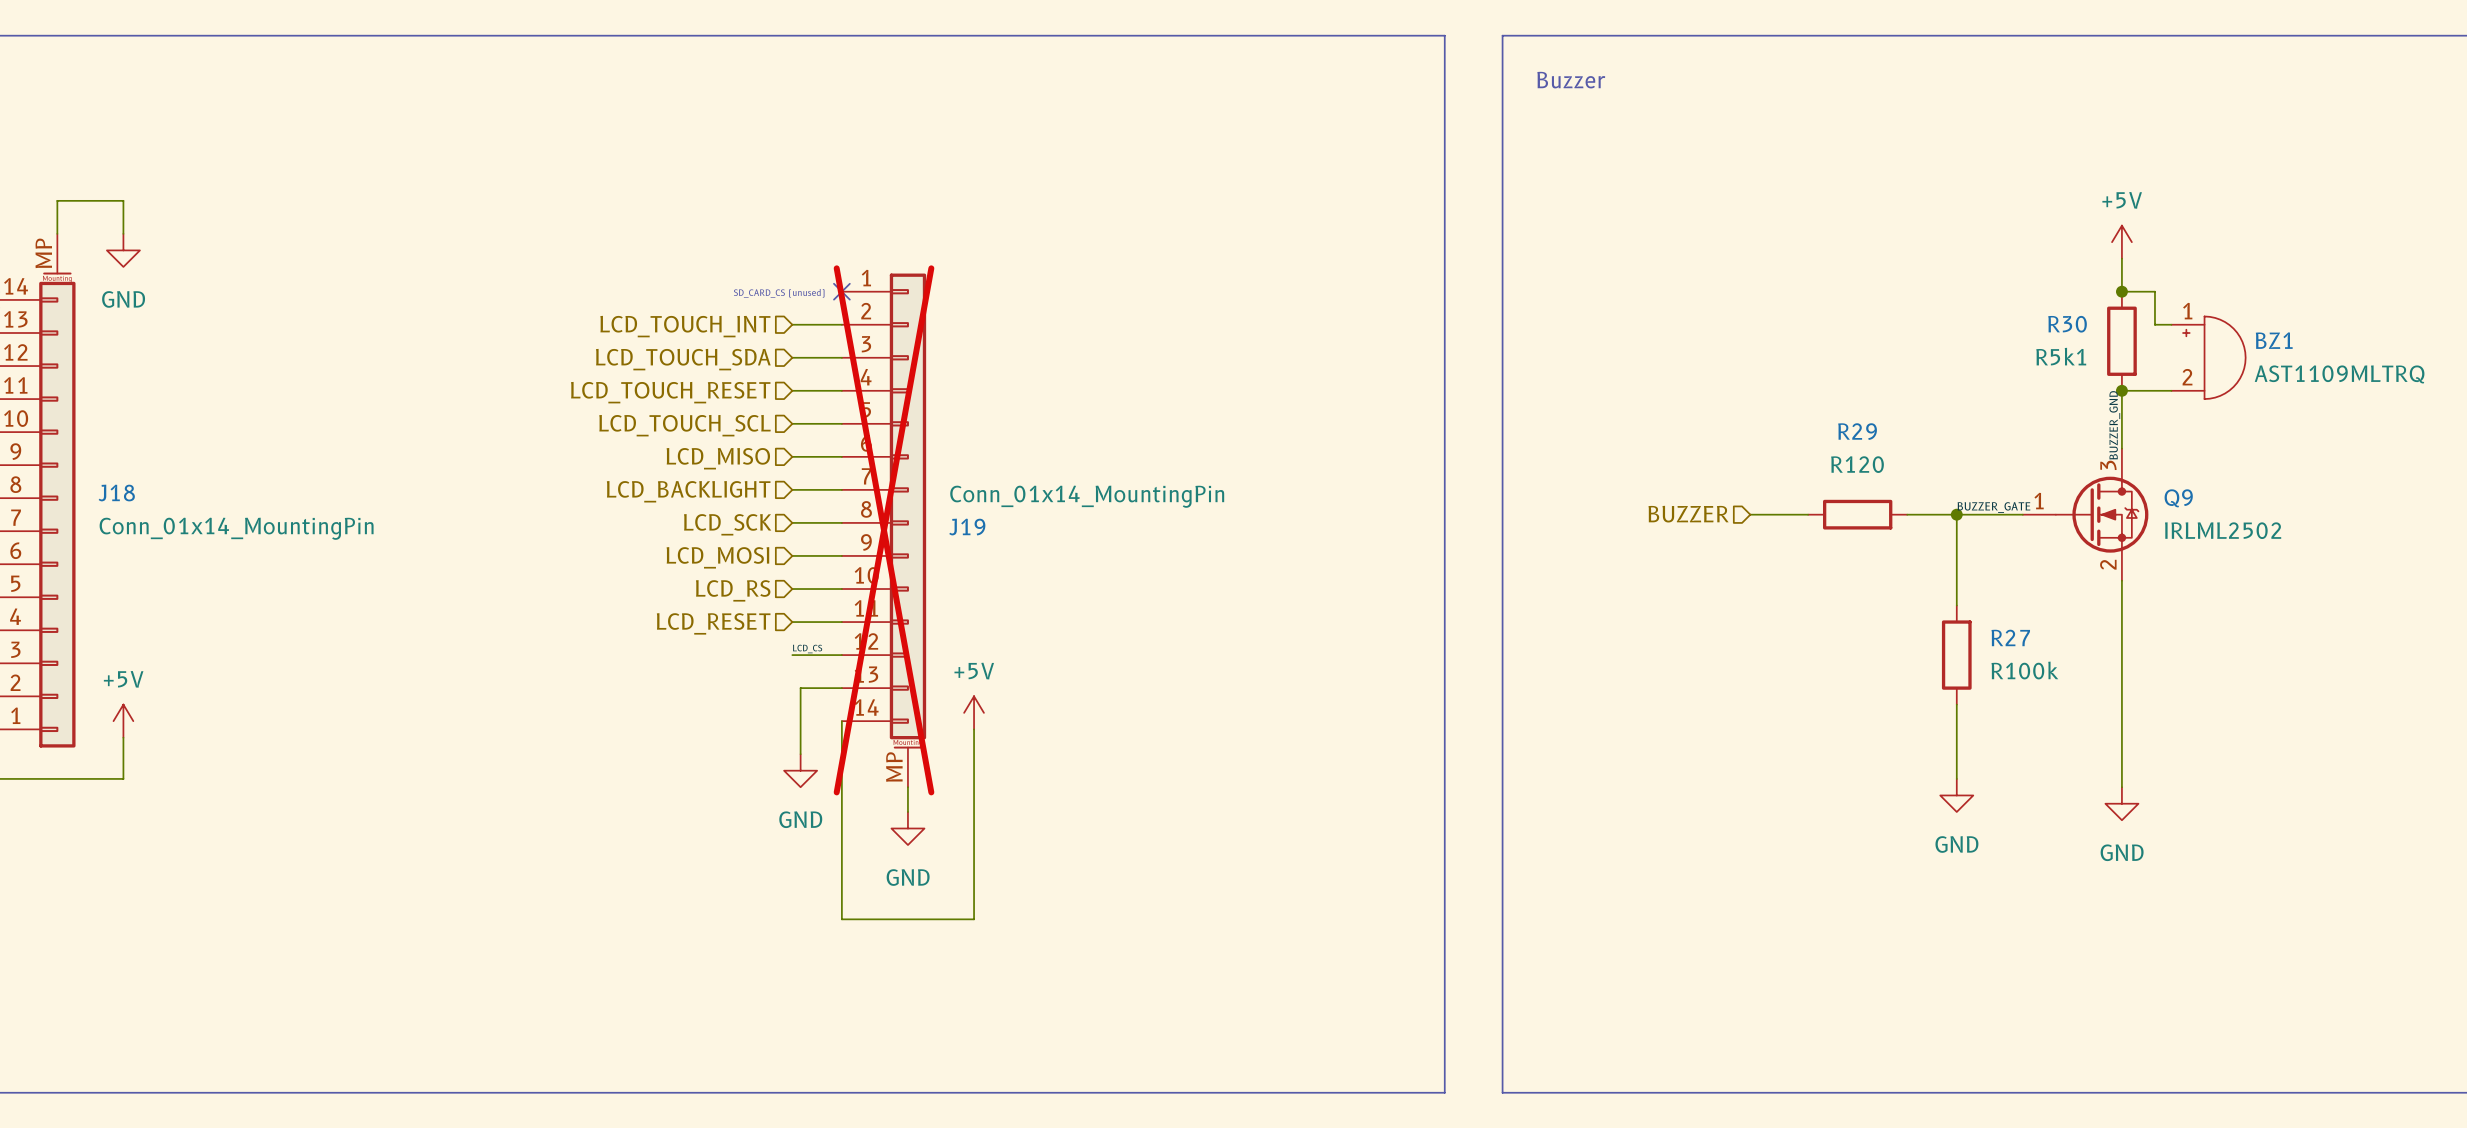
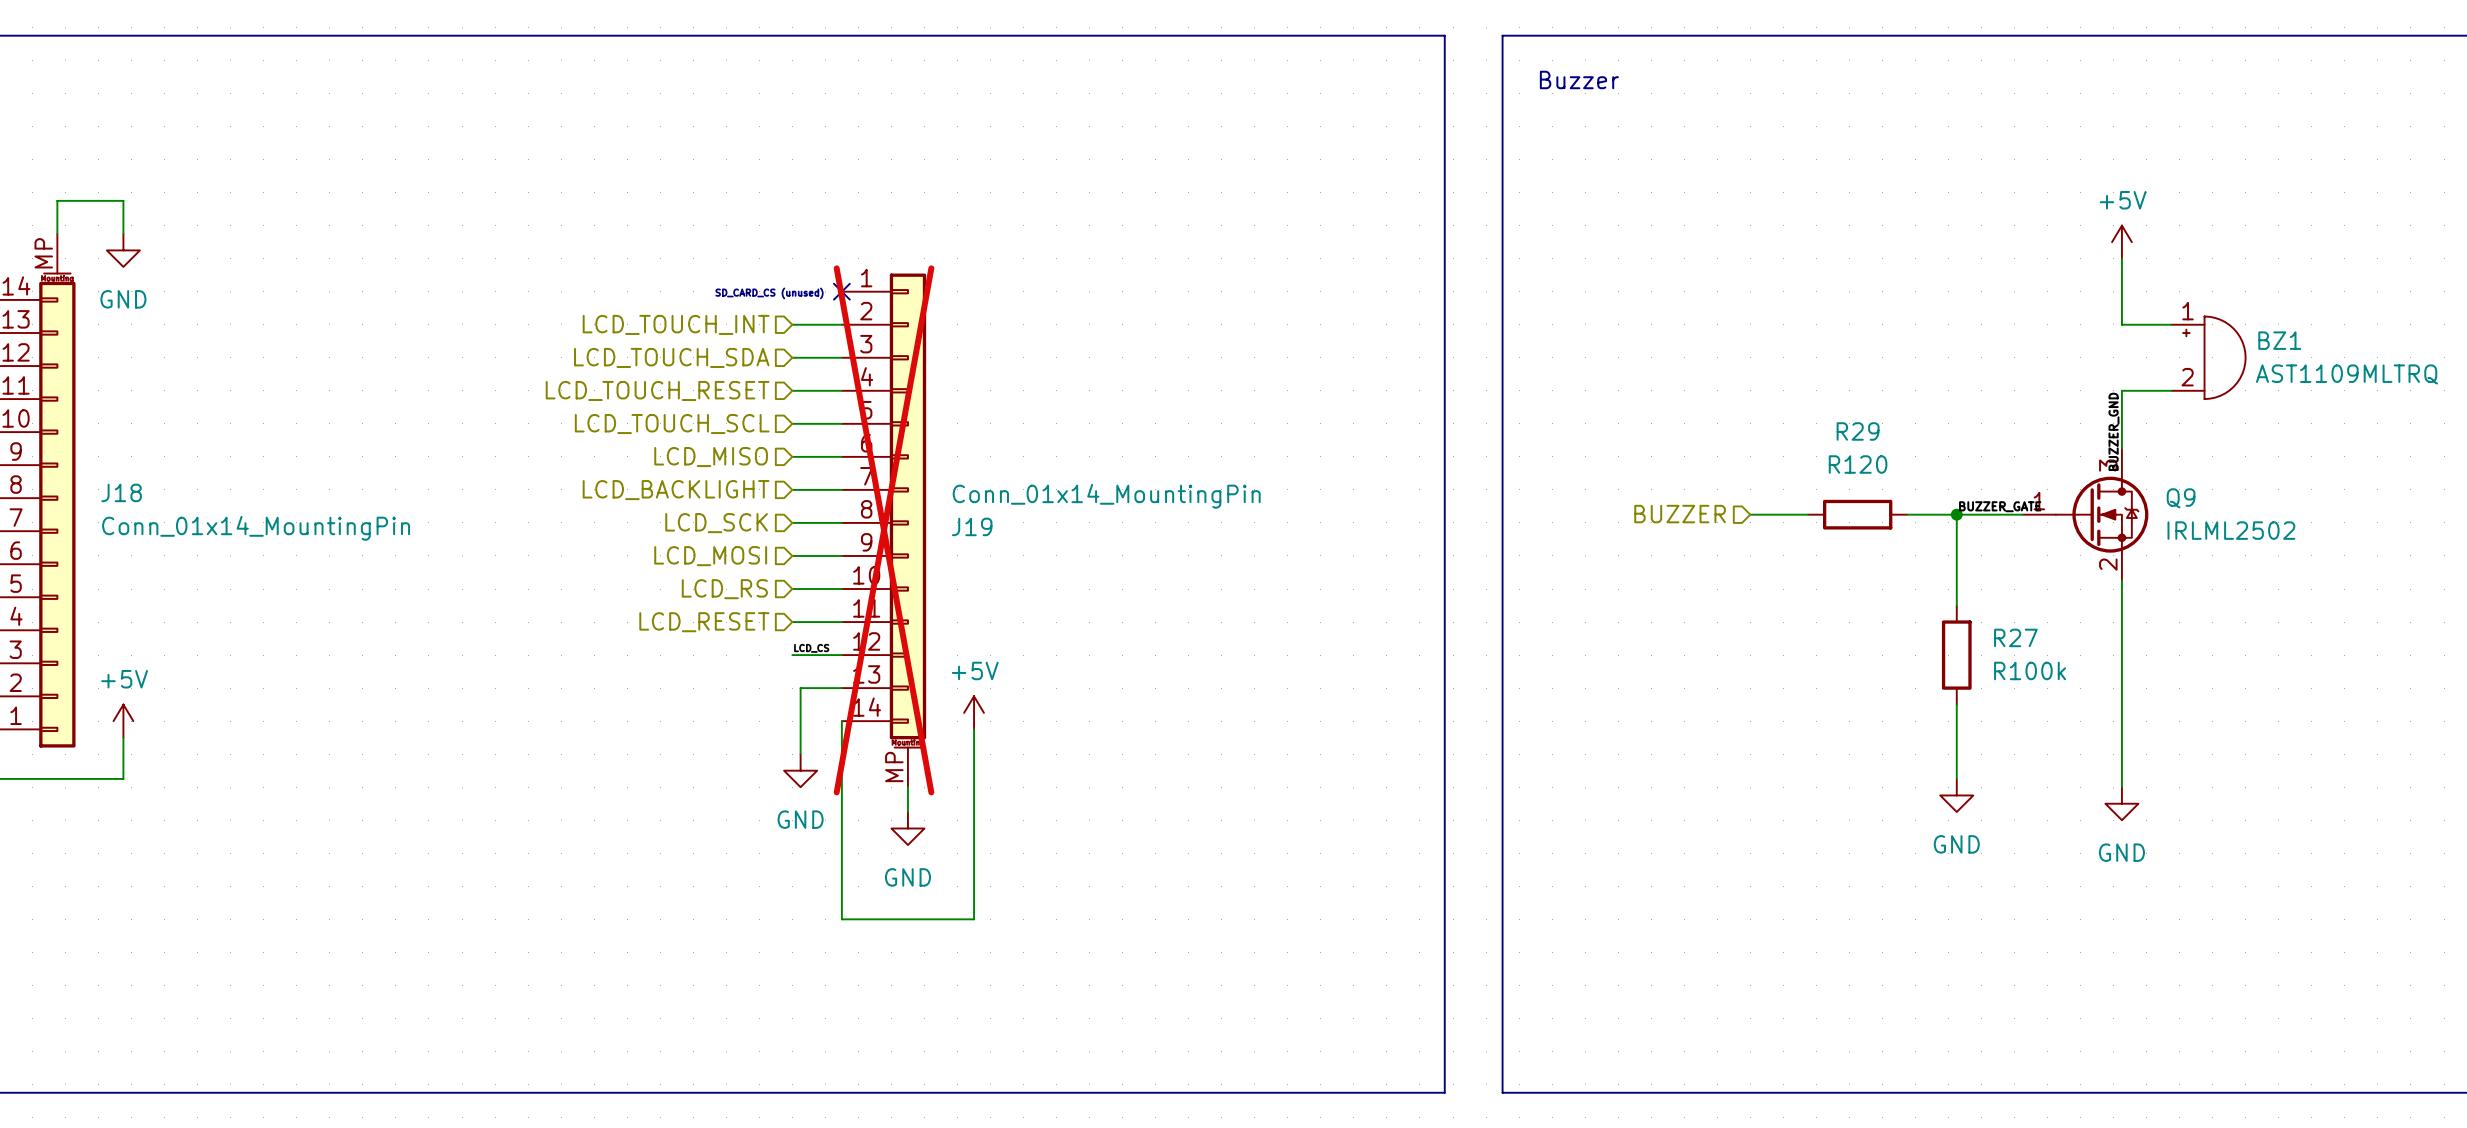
wire: (2121, 291) (2154, 291) (2154, 324) -> (2121, 291) (2121, 324) (2154, 324)
junction: (2121, 291) -> none
R30: R5k1 (2121, 341) -> none
junction: (2121, 390) -> none

